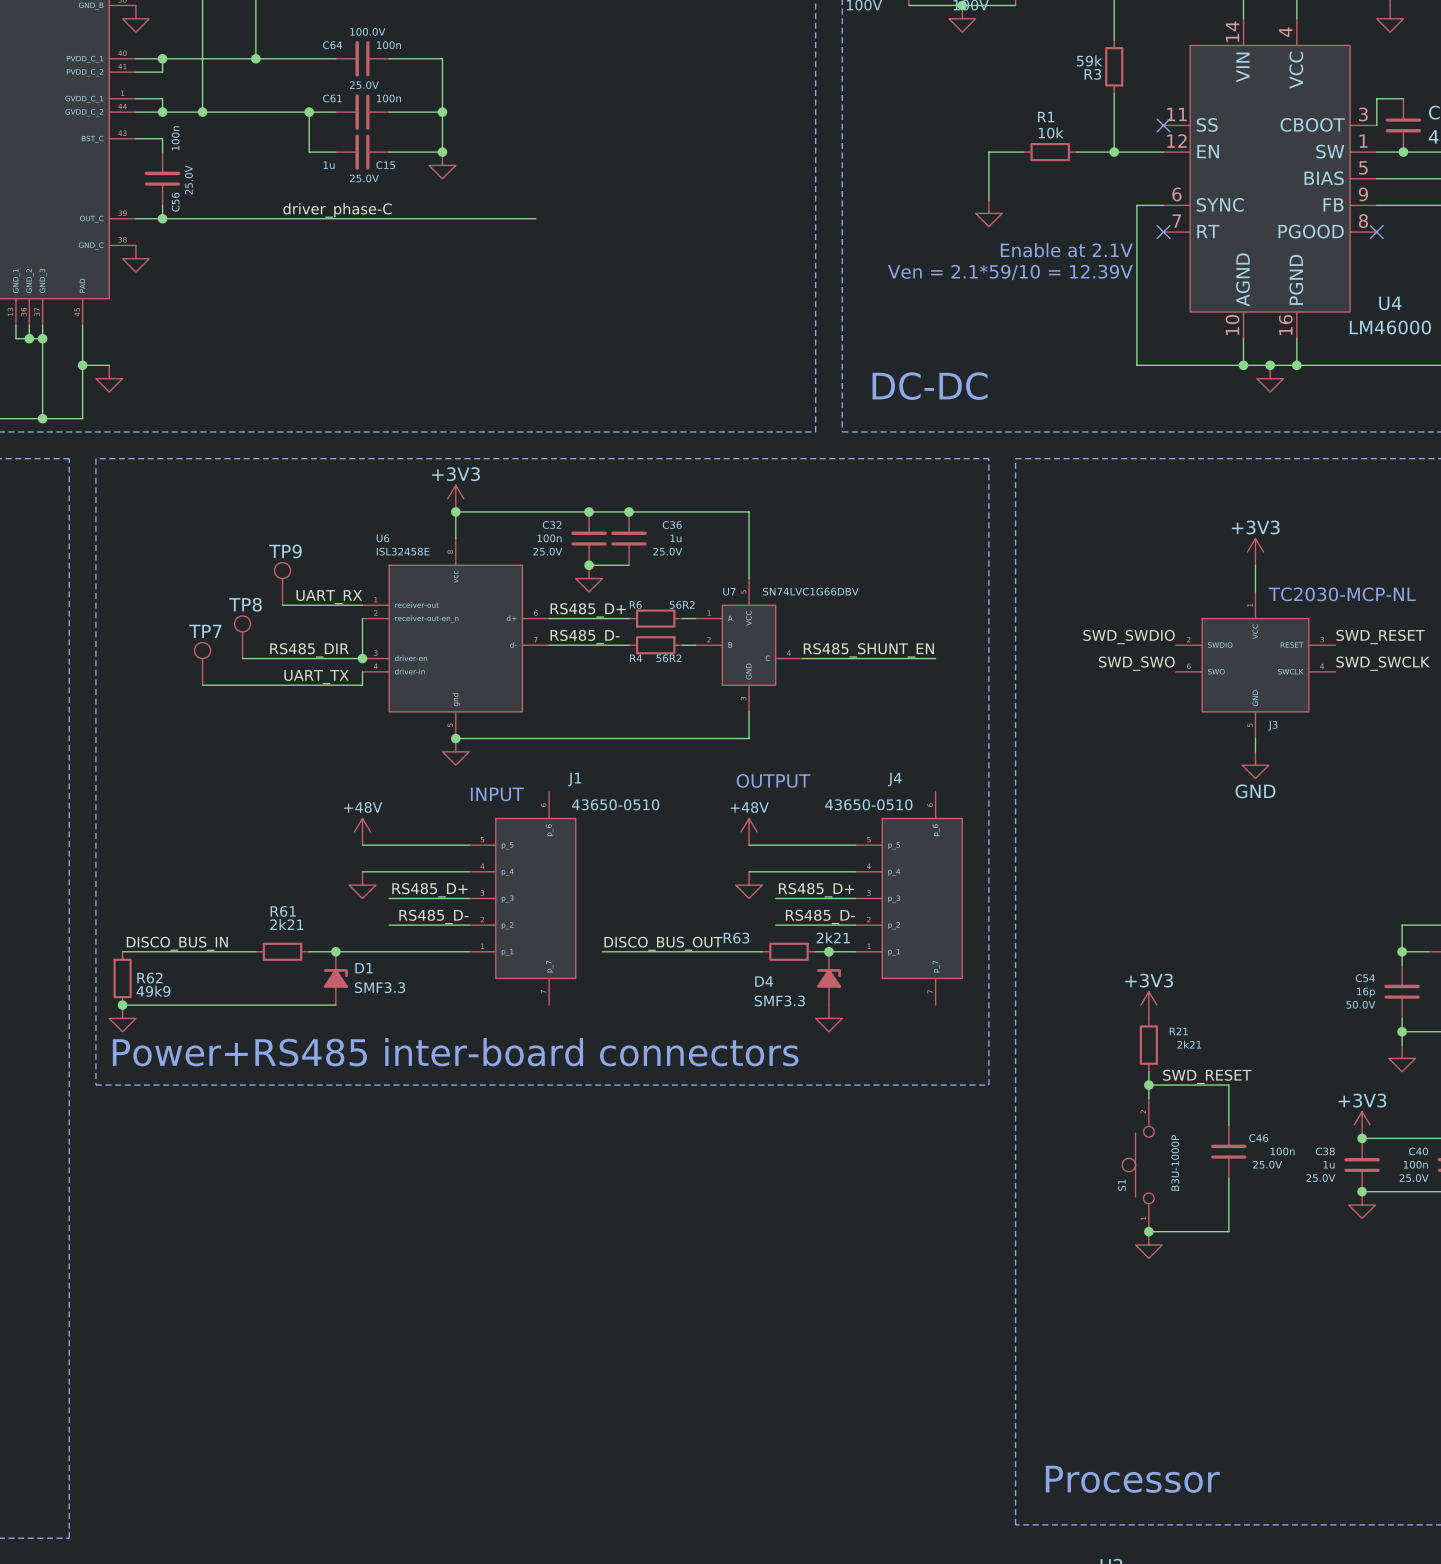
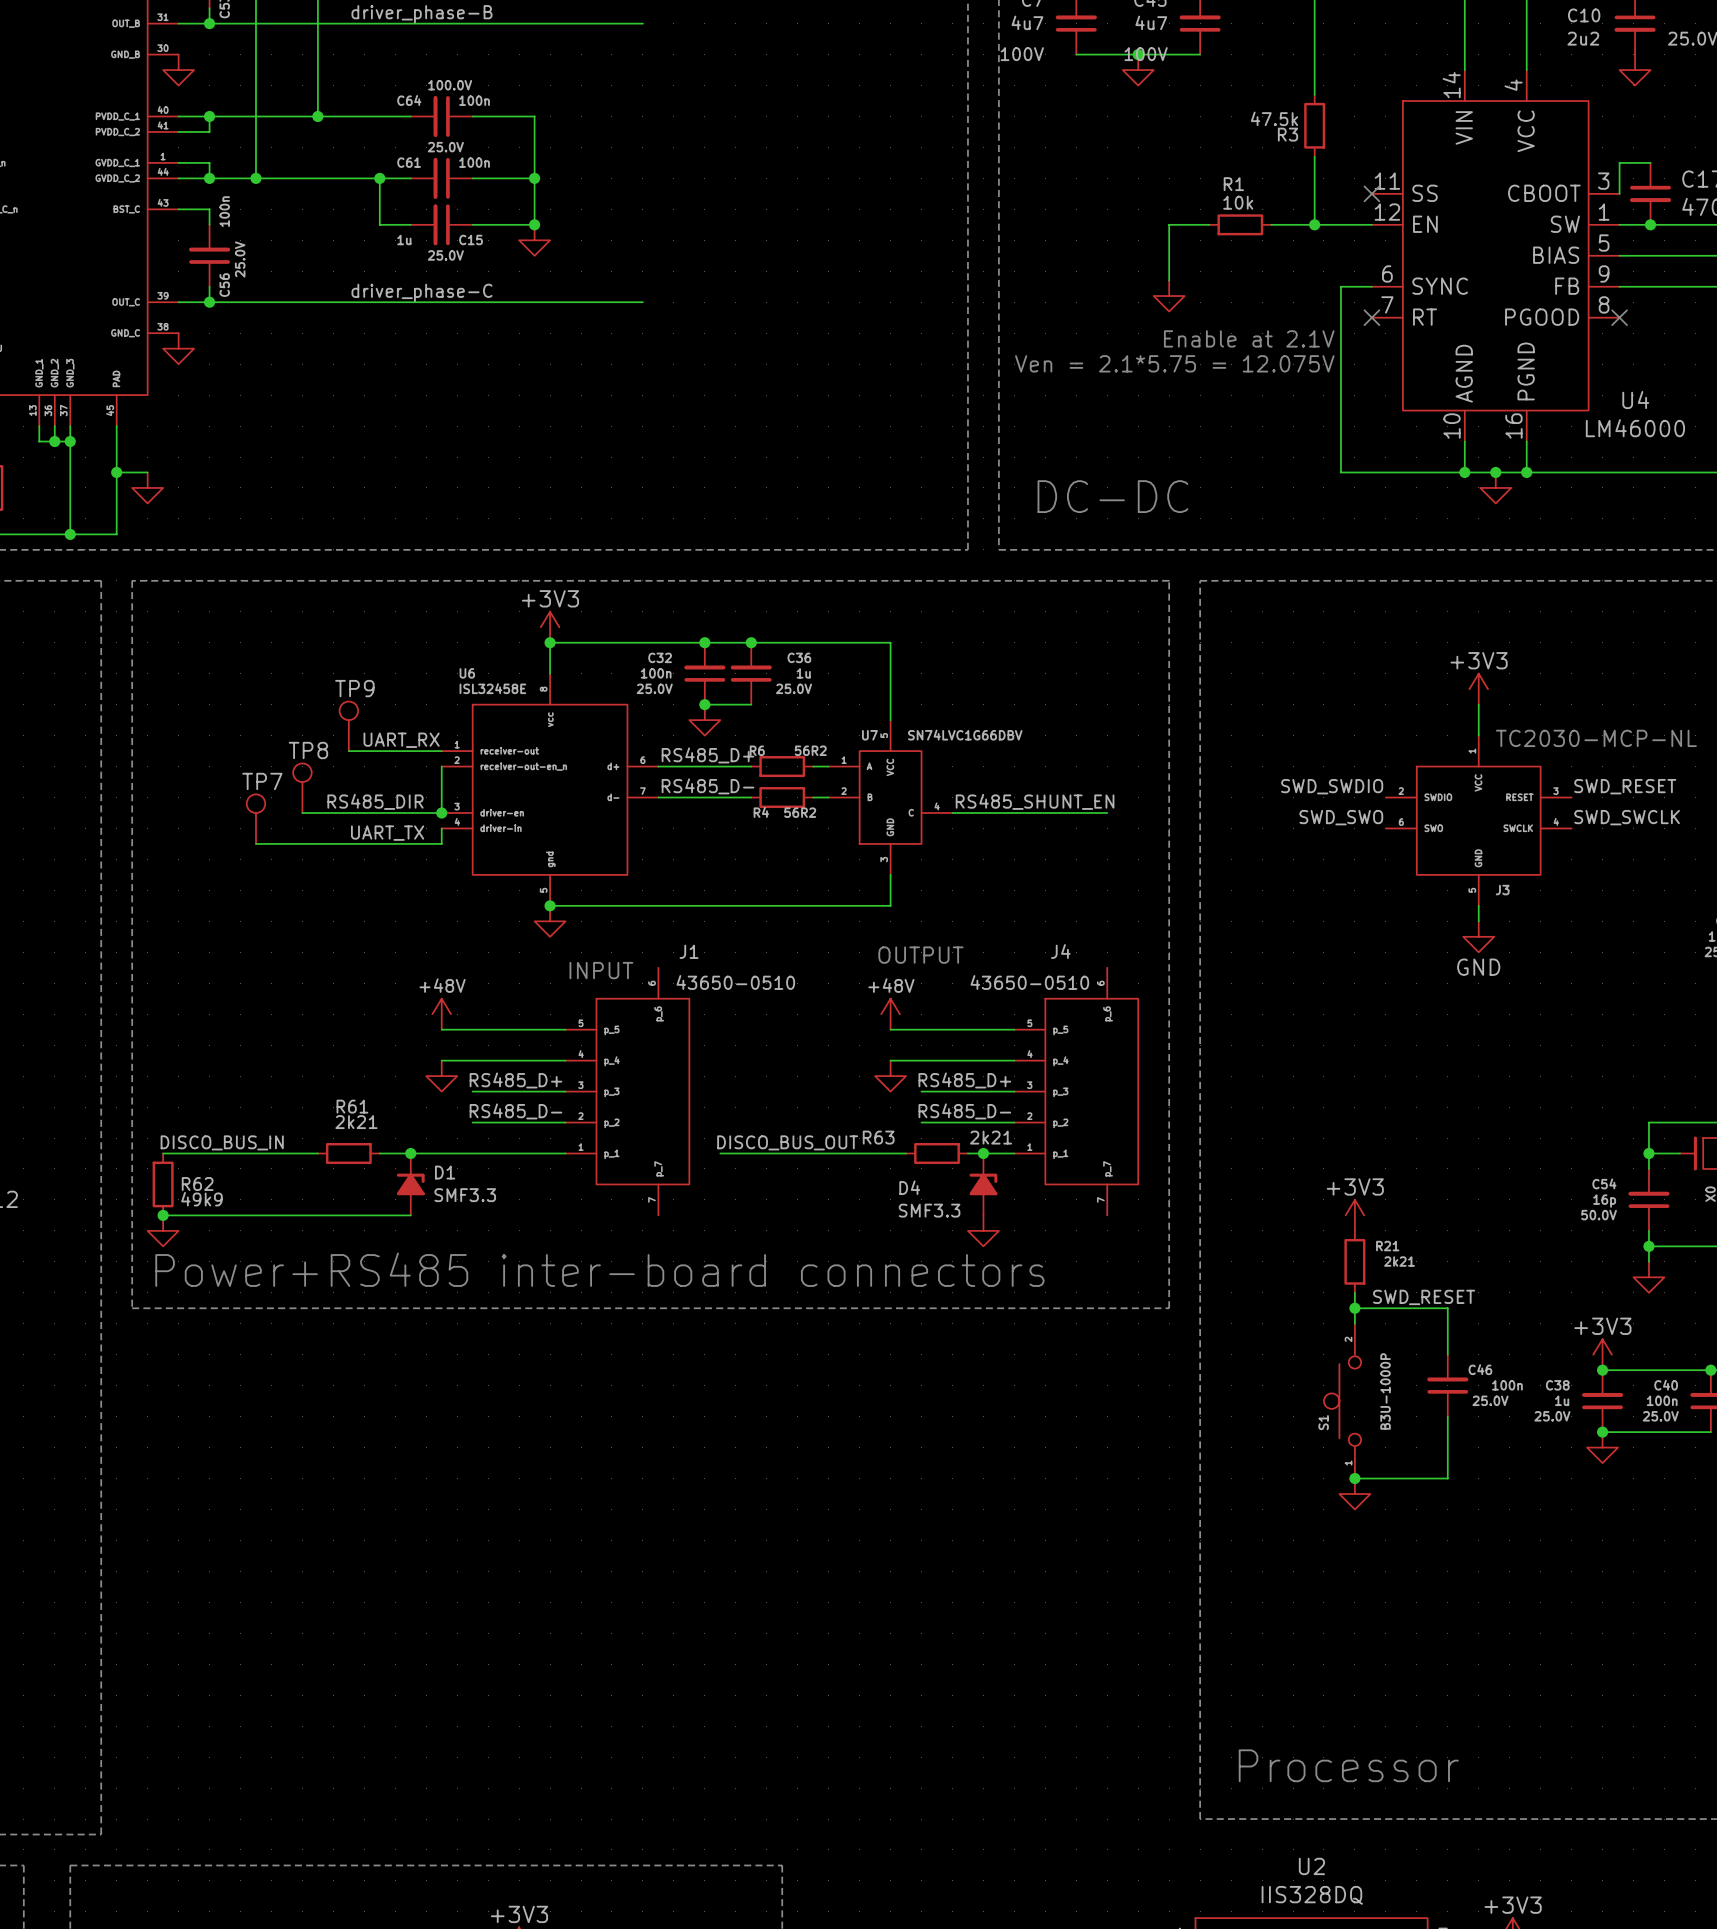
R3 value: 59k (1089, 60) -> 47.5k (1274, 118)
text: Ven = 2.1*59/10 = 12.39V (1010, 272) -> Ven = 2.1*5.75 = 12.075V (1174, 363)

